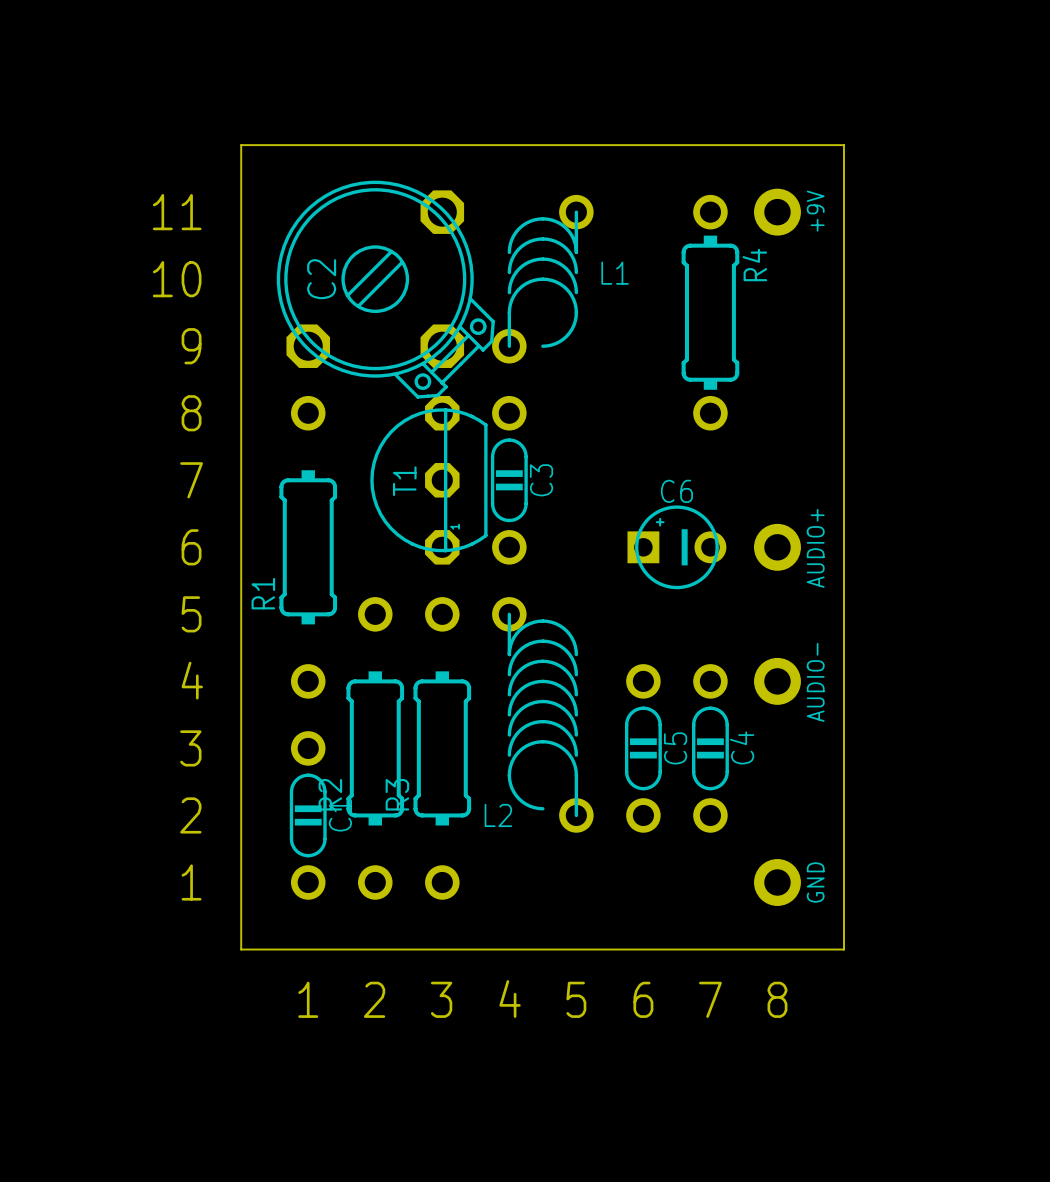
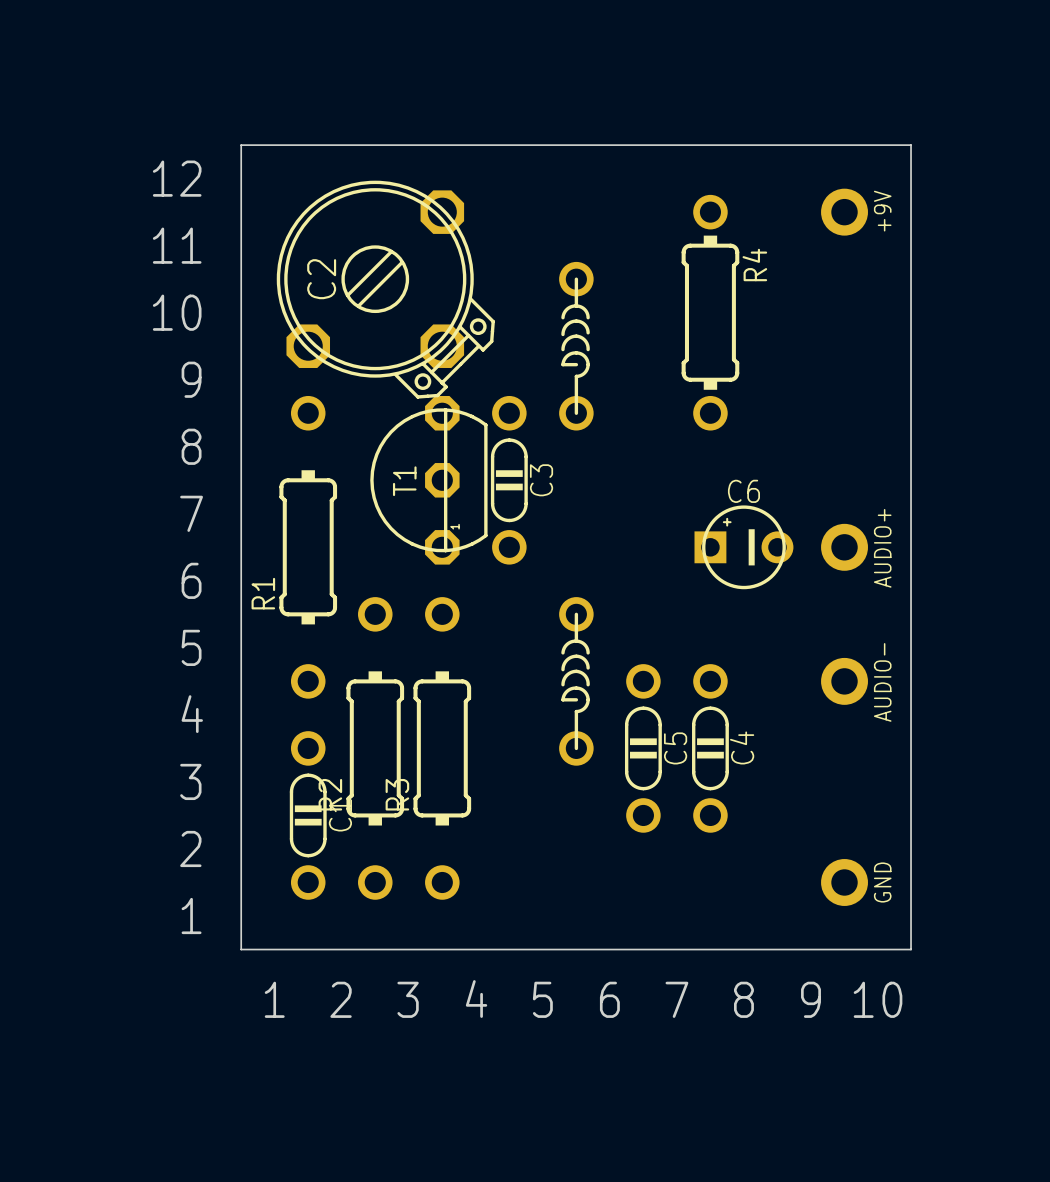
board edge: (843, 145) (843, 949) -> (843, 145) (911, 145) (911, 949) (843, 949)
text: none -> 12 (177, 178)
text position: 11 (177, 212) -> 11 (177, 245)
+9V position: (777, 212) -> (844, 212)
text position: 10 (177, 279) -> 10 (177, 312)
L1: (542, 279) -> none
text position: 9 (191, 346) -> 9 (191, 379)
part: none -> (576, 346)
text position: 8 (191, 413) -> 8 (191, 446)
text position: 7 (191, 480) -> 7 (191, 513)
text position: 6 (191, 547) -> 6 (191, 580)
C6 position: (676, 547) -> (743, 547)
AUDIO+ position: (777, 547) -> (844, 547)
text position: 5 (191, 614) -> 5 (191, 647)
text position: 4 (192, 680) -> 4 (192, 714)
part: none -> (576, 681)
AUDIO- position: (777, 681) -> (844, 681)
L2: (542, 714) -> none
text position: 3 (190, 748) -> 3 (190, 781)
text position: 2 (190, 815) -> 2 (190, 848)
text position: 1 (191, 882) -> 1 (191, 916)
GND position: (777, 882) -> (844, 882)
text position: 1 (308, 999) -> 1 (274, 999)
text position: 2 (374, 999) -> 2 (341, 999)
text position: 3 (441, 999) -> 3 (408, 999)
text position: 4 (510, 999) -> 4 (476, 999)
text position: 5 (576, 999) -> 5 (542, 999)
text position: 6 (643, 999) -> 6 (609, 999)
text position: 7 (710, 999) -> 7 (676, 999)
text position: 8 (777, 999) -> 8 (743, 999)
text: none -> 9 (811, 999)
text: none -> 10 (878, 999)

